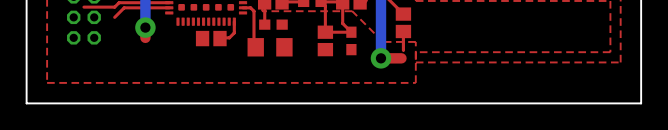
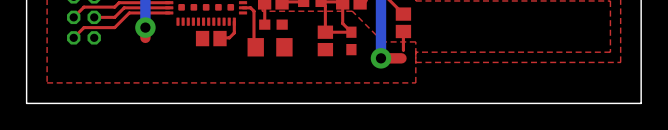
top track: none -> (83, 7) (73, 17)
top track: none -> (169, 12) (129, 12) (114, 27) (83, 27) (73, 37)
top track: none -> (114, 17) (94, 17)

